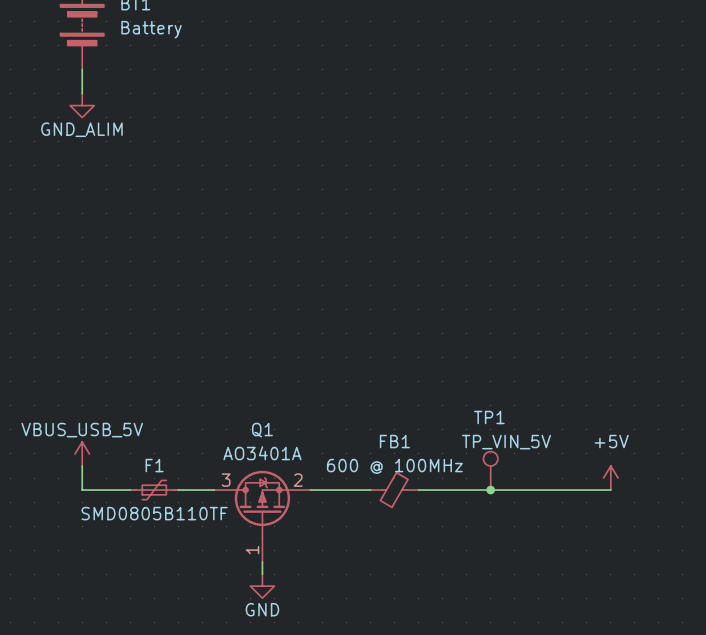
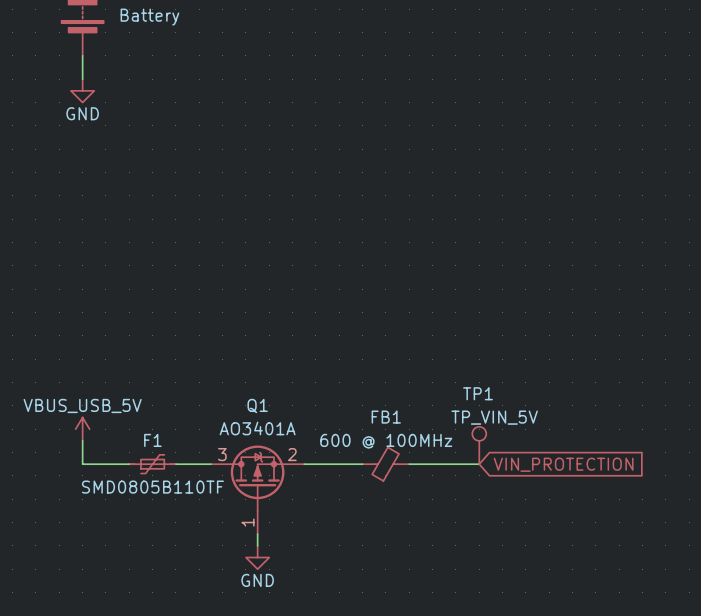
power symbol: GND_ALIM (82, 105) -> GND (82, 90)
power symbol: +5V (610, 478) -> none
wire: (490, 490) (610, 490) -> none
junction: (490, 490) -> none
global label: none -> VIN_PROTECTION (563, 464)

